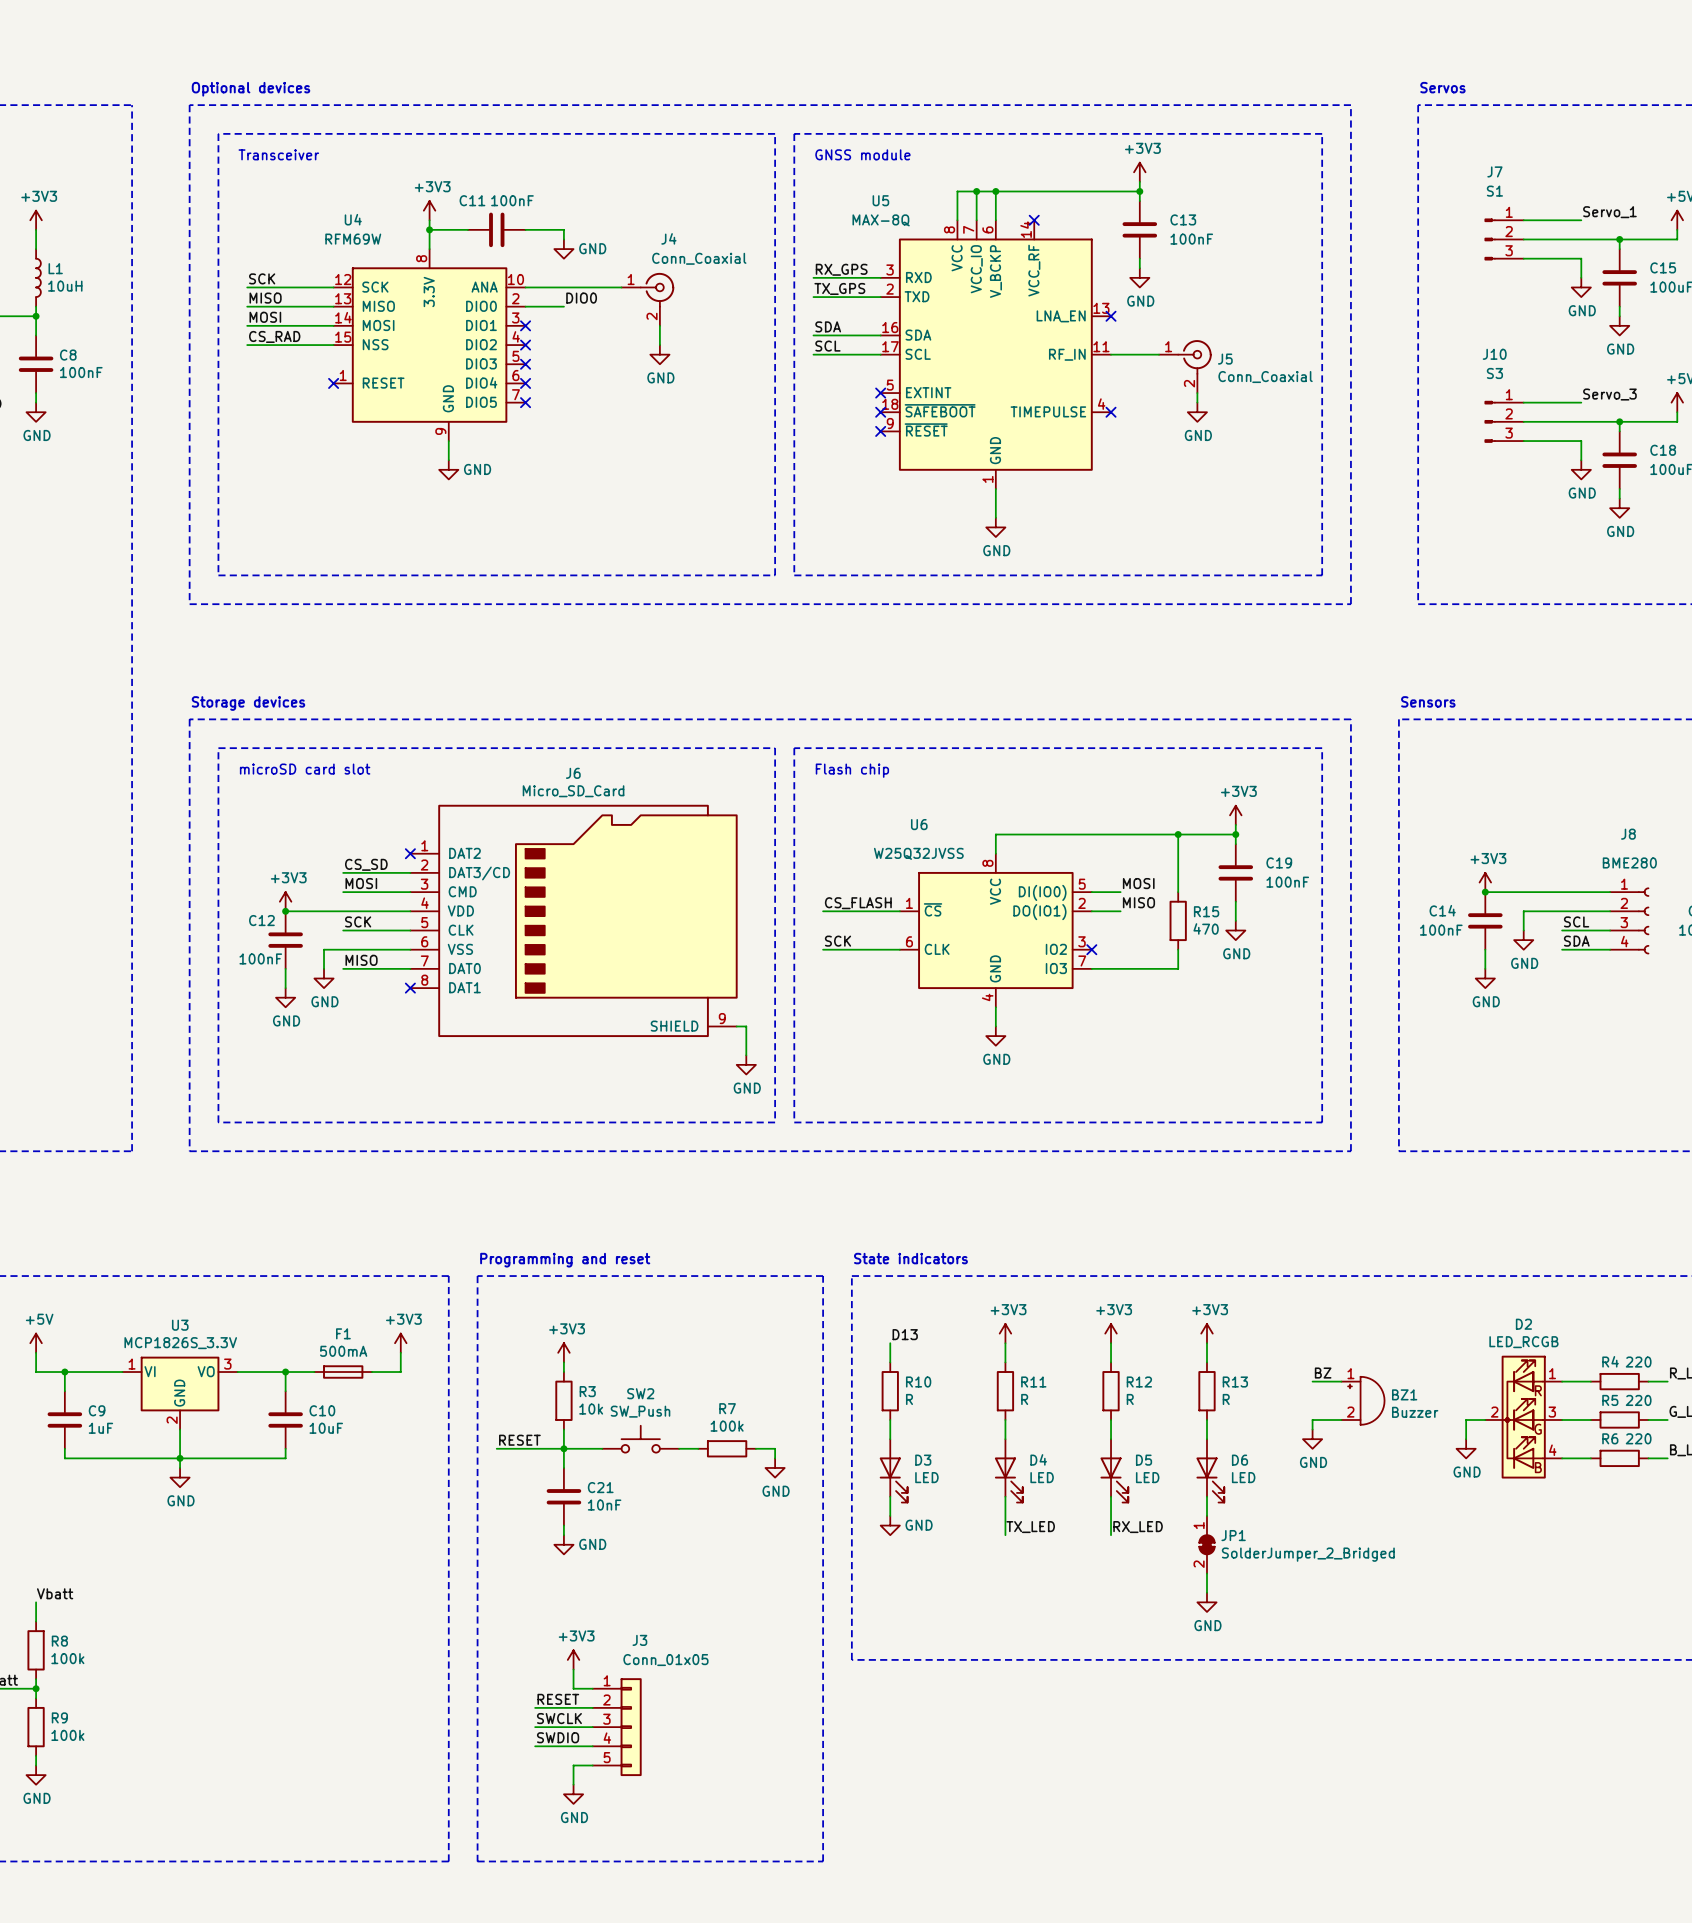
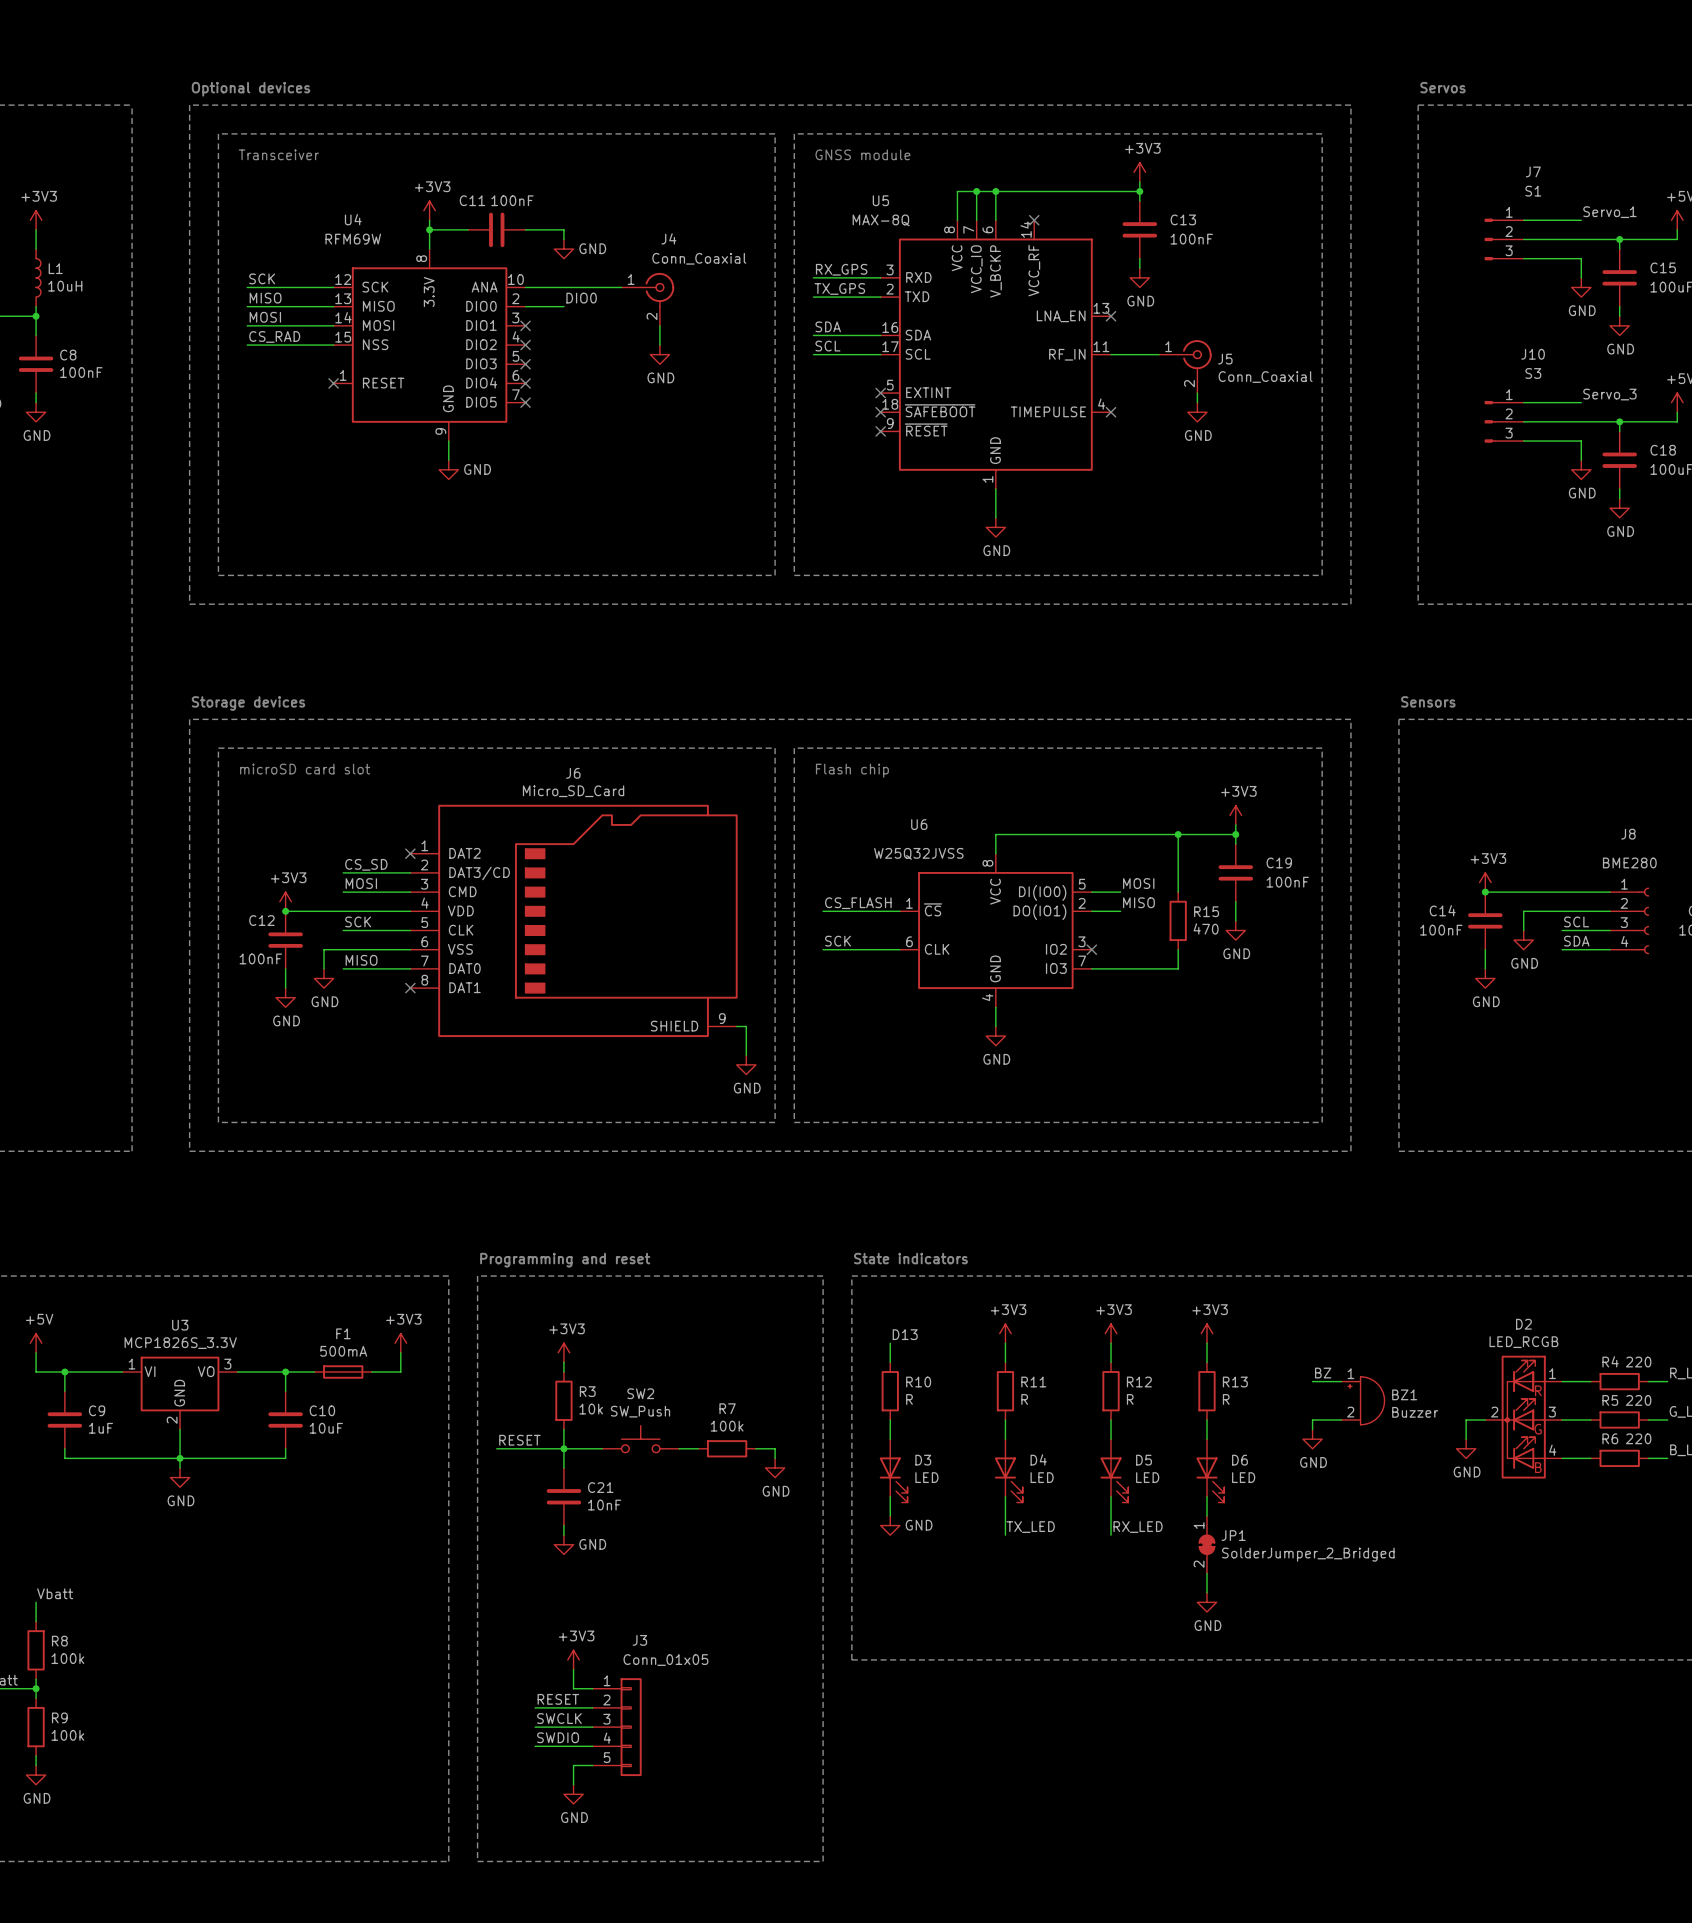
J7 name position: J7 (1494, 171) -> J7 (1533, 171)
J7 value position: S1 (1494, 191) -> S1 (1533, 191)
J10 name position: J10 (1494, 354) -> J10 (1533, 354)
J10 value position: S3 (1494, 373) -> S3 (1533, 373)

